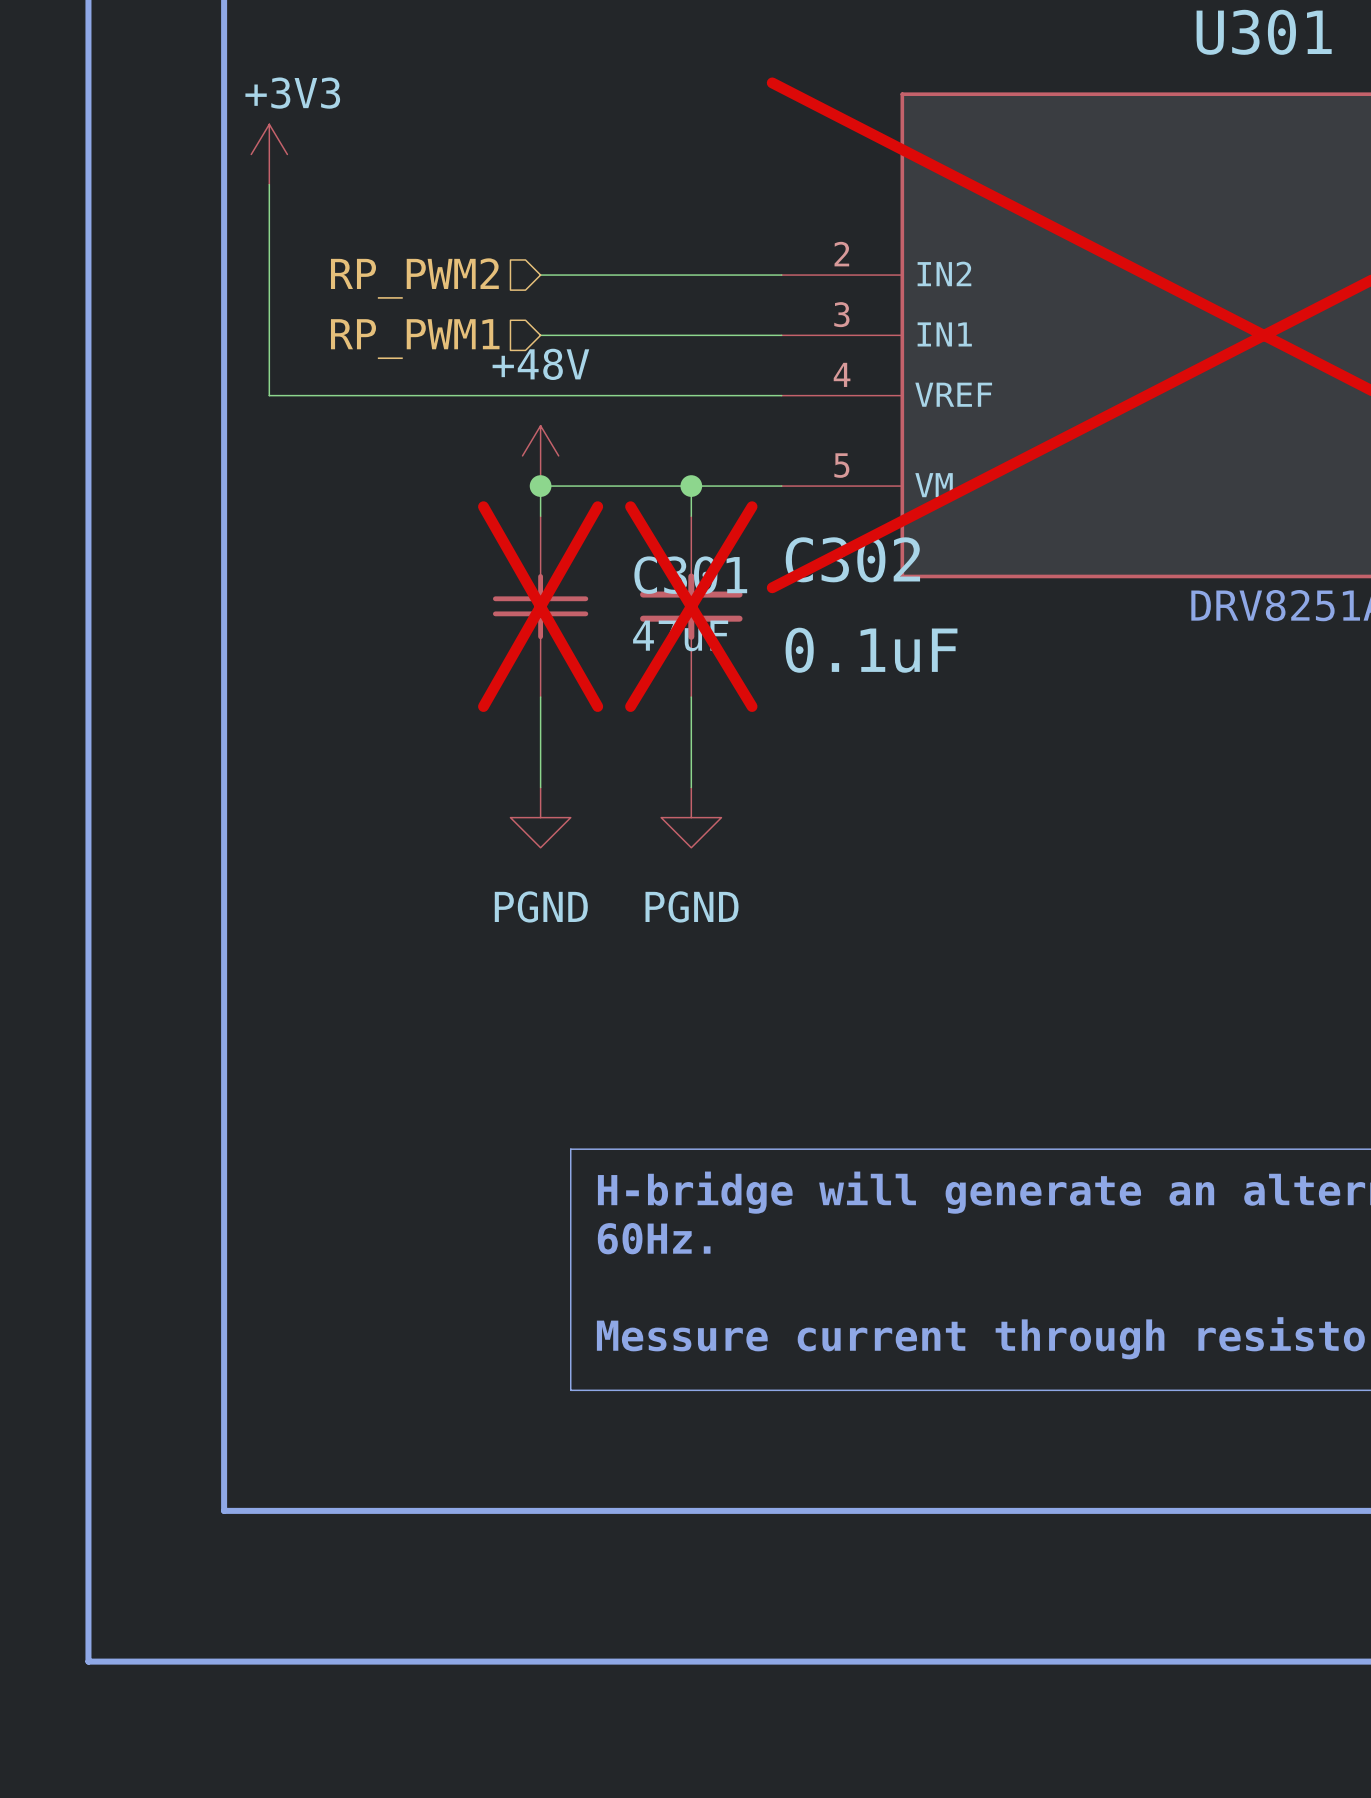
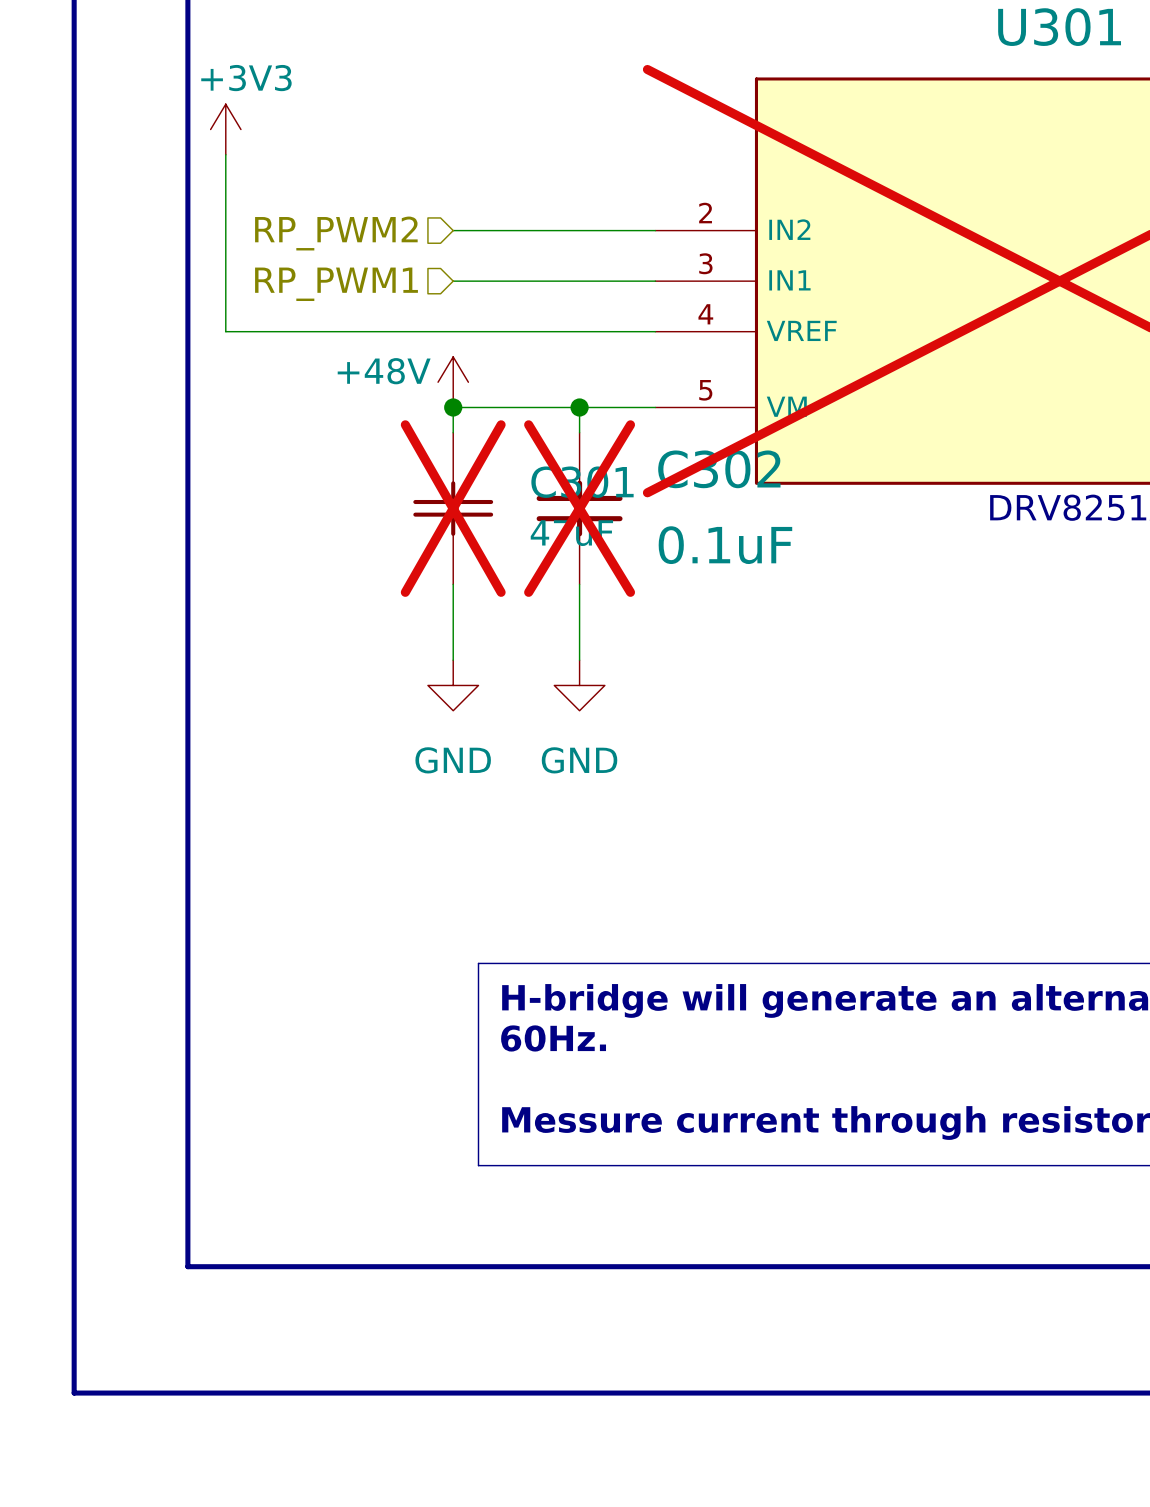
power symbol text position: +48V (540, 364) -> +48V (384, 371)
power symbol: PGND (540, 817) -> GND (453, 685)
power symbol: PGND (691, 817) -> GND (579, 685)

